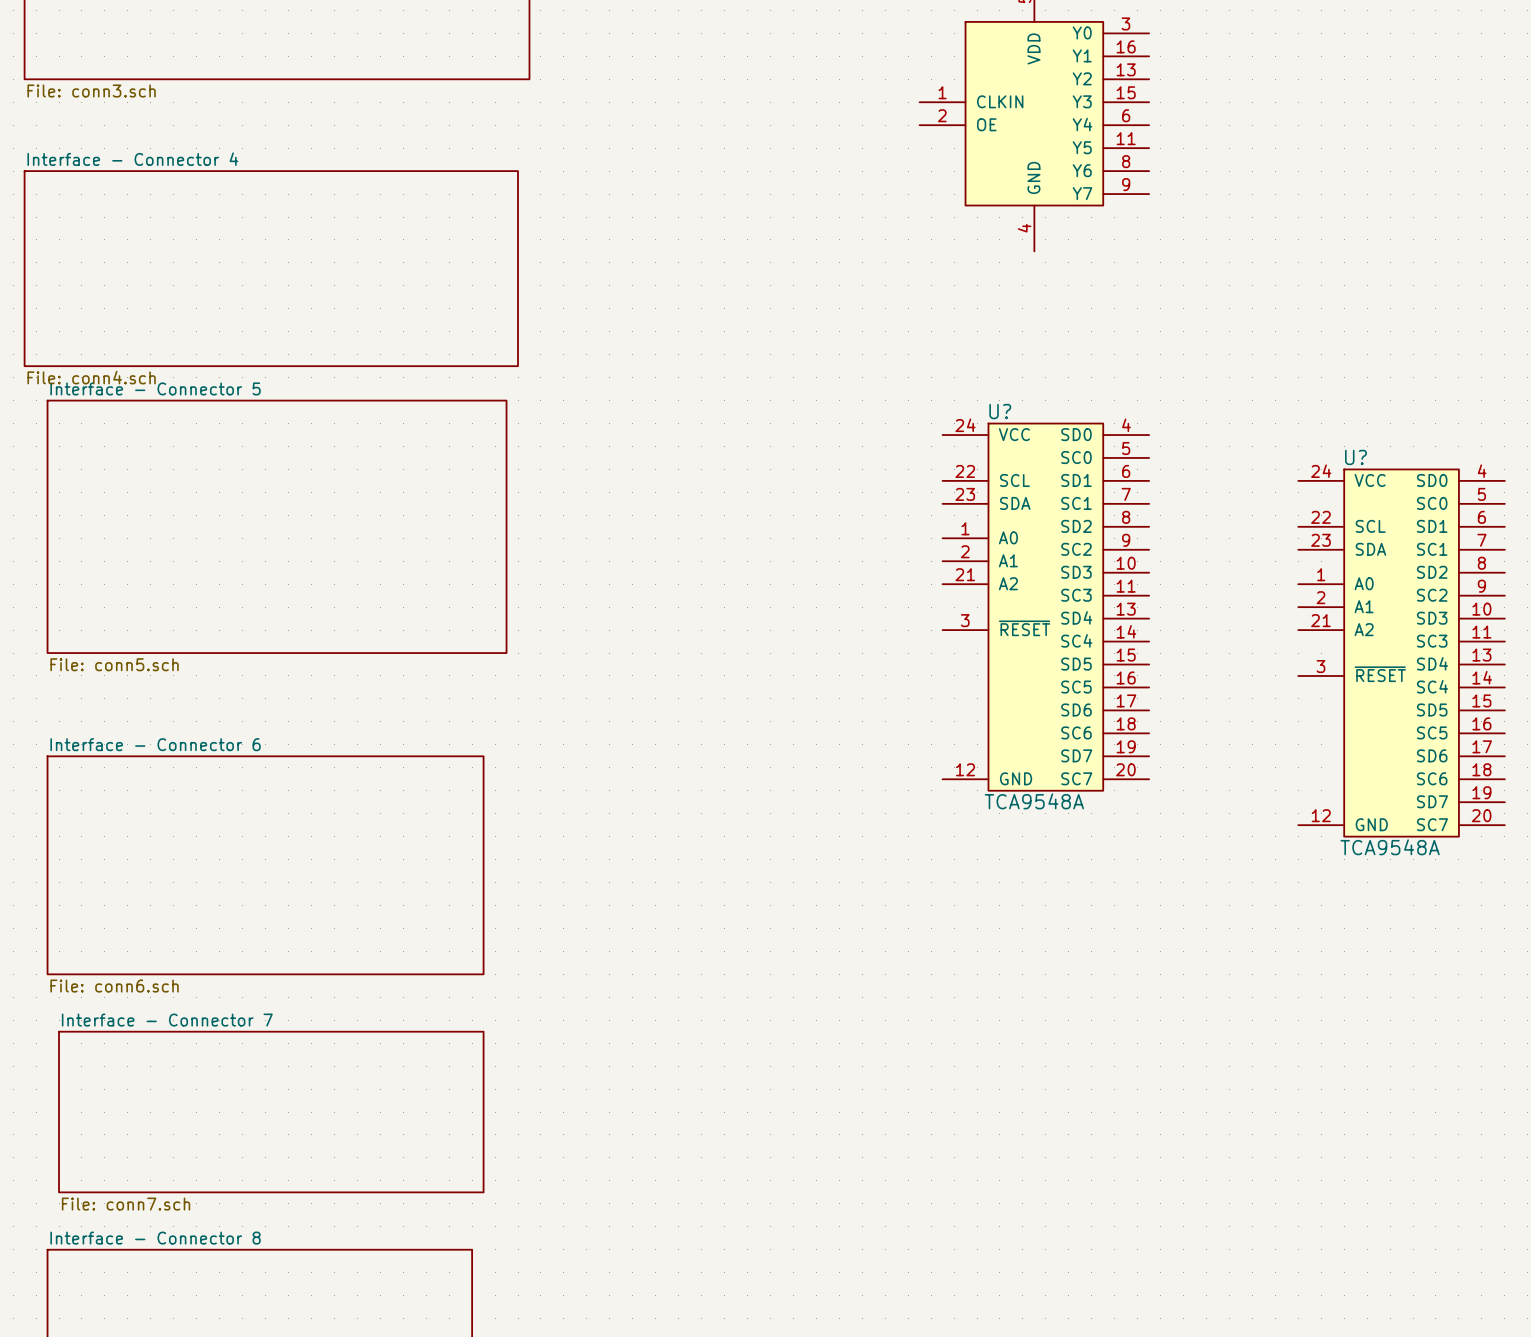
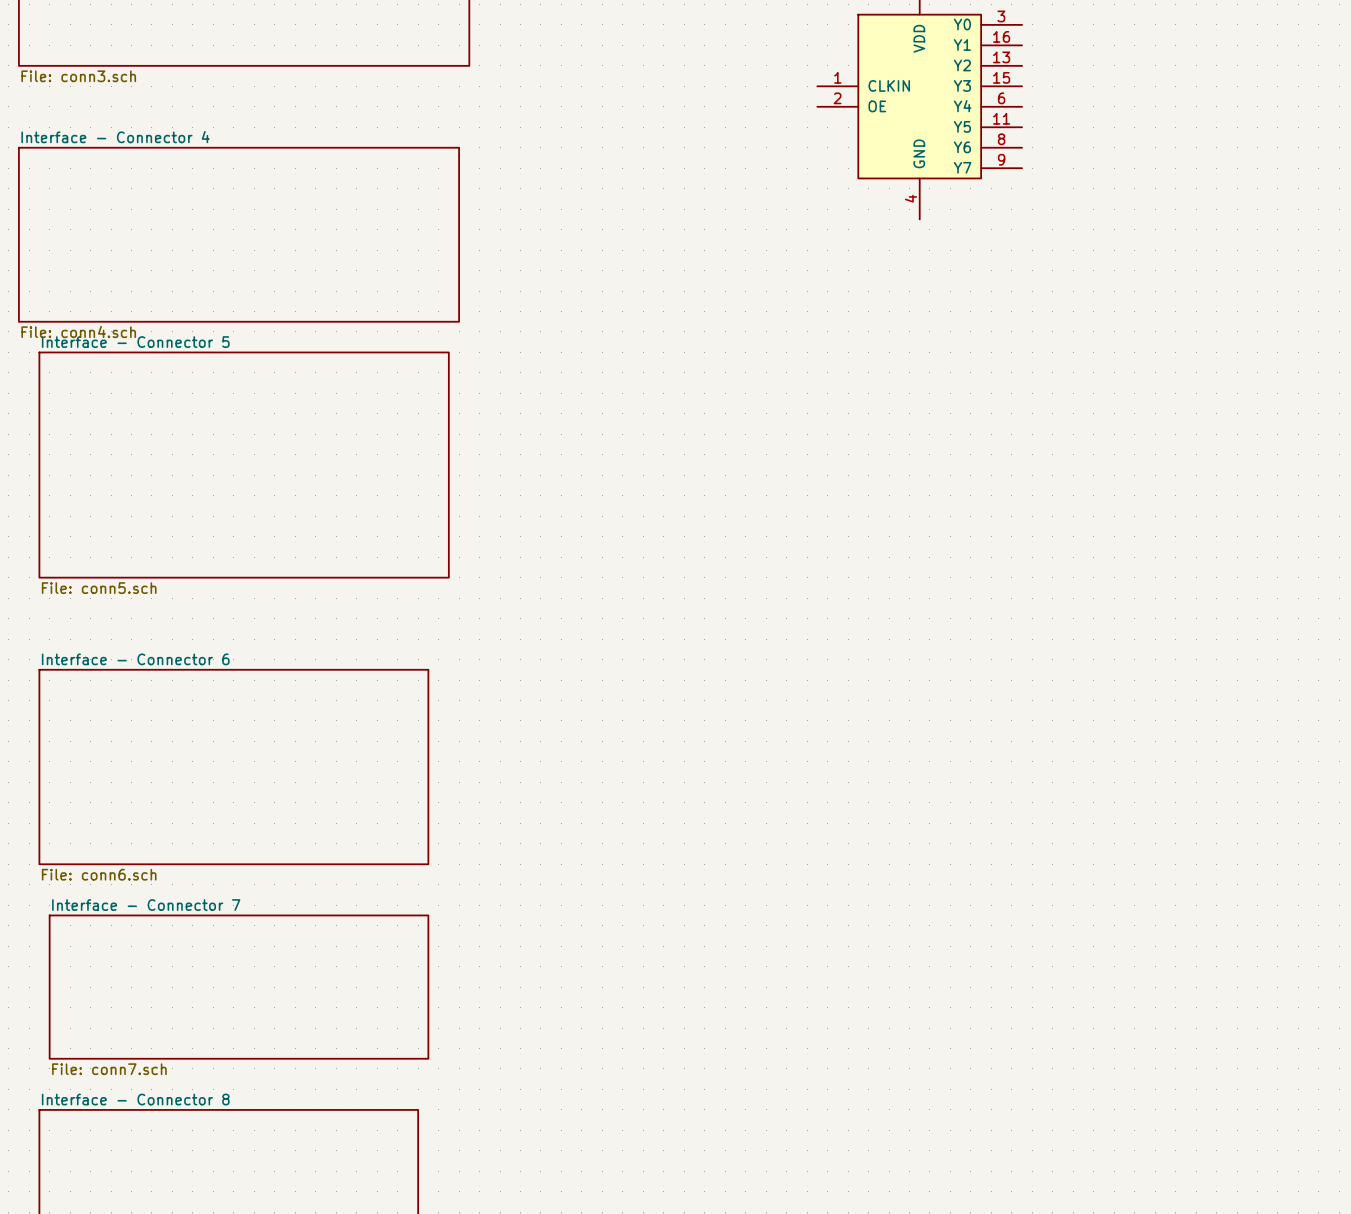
U?: TCA9548A (1045, 607) -> none
U?: TCA9548A (1401, 653) -> none

